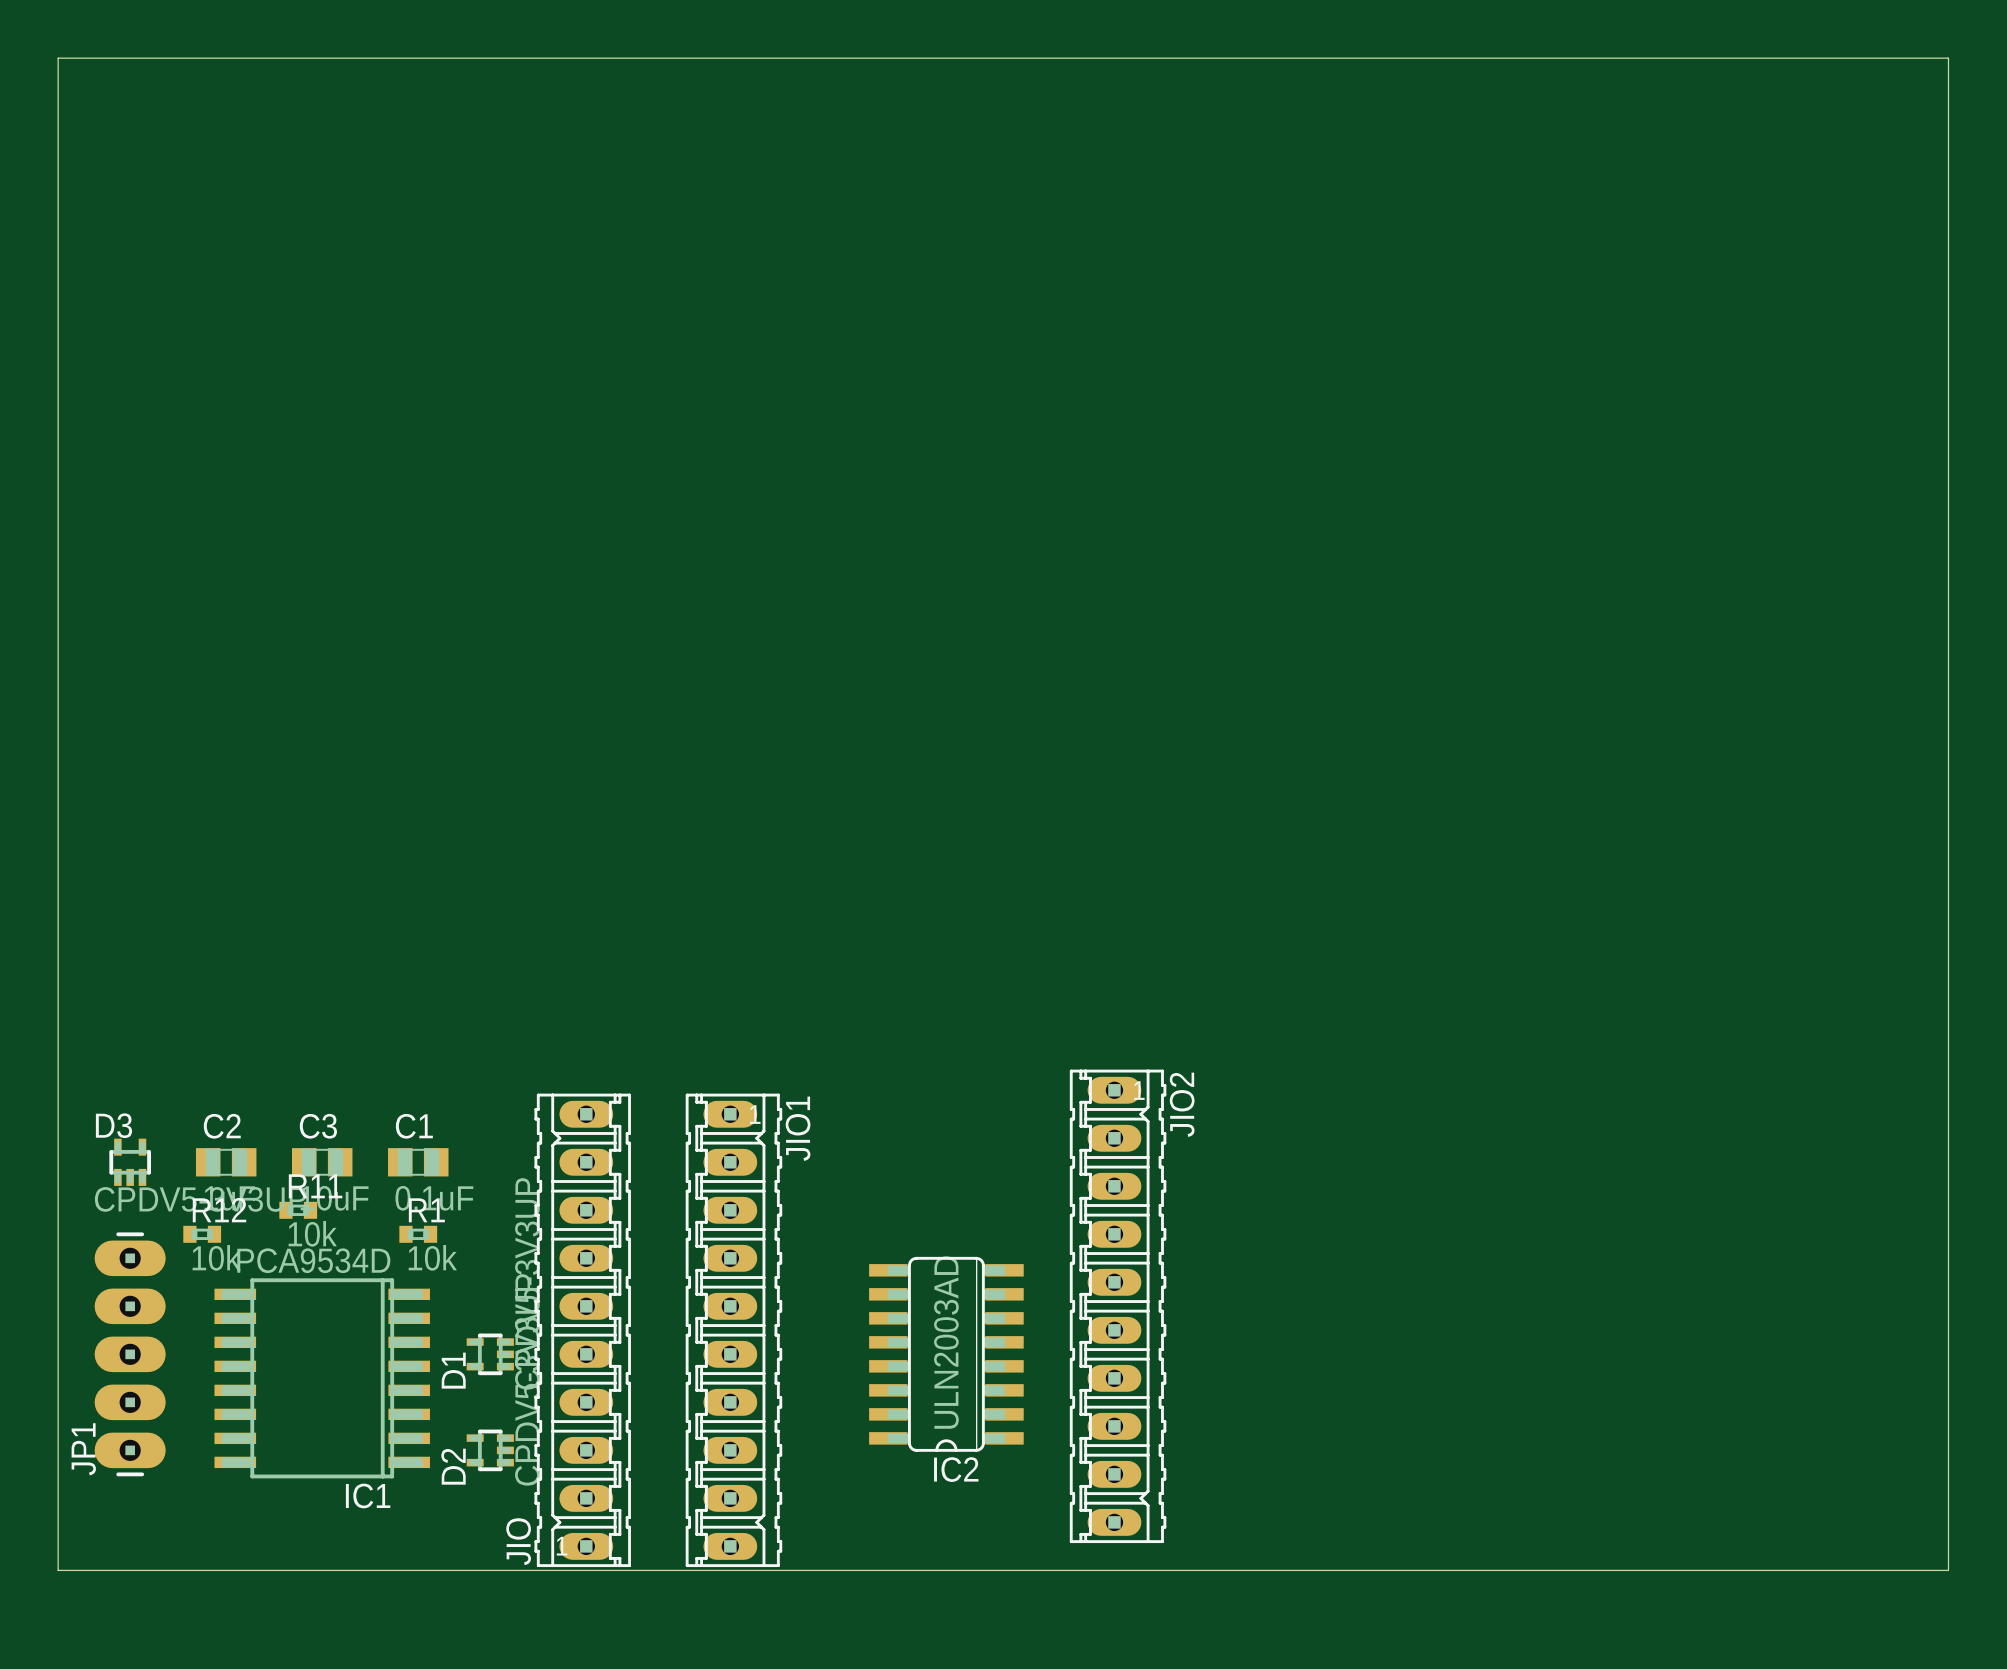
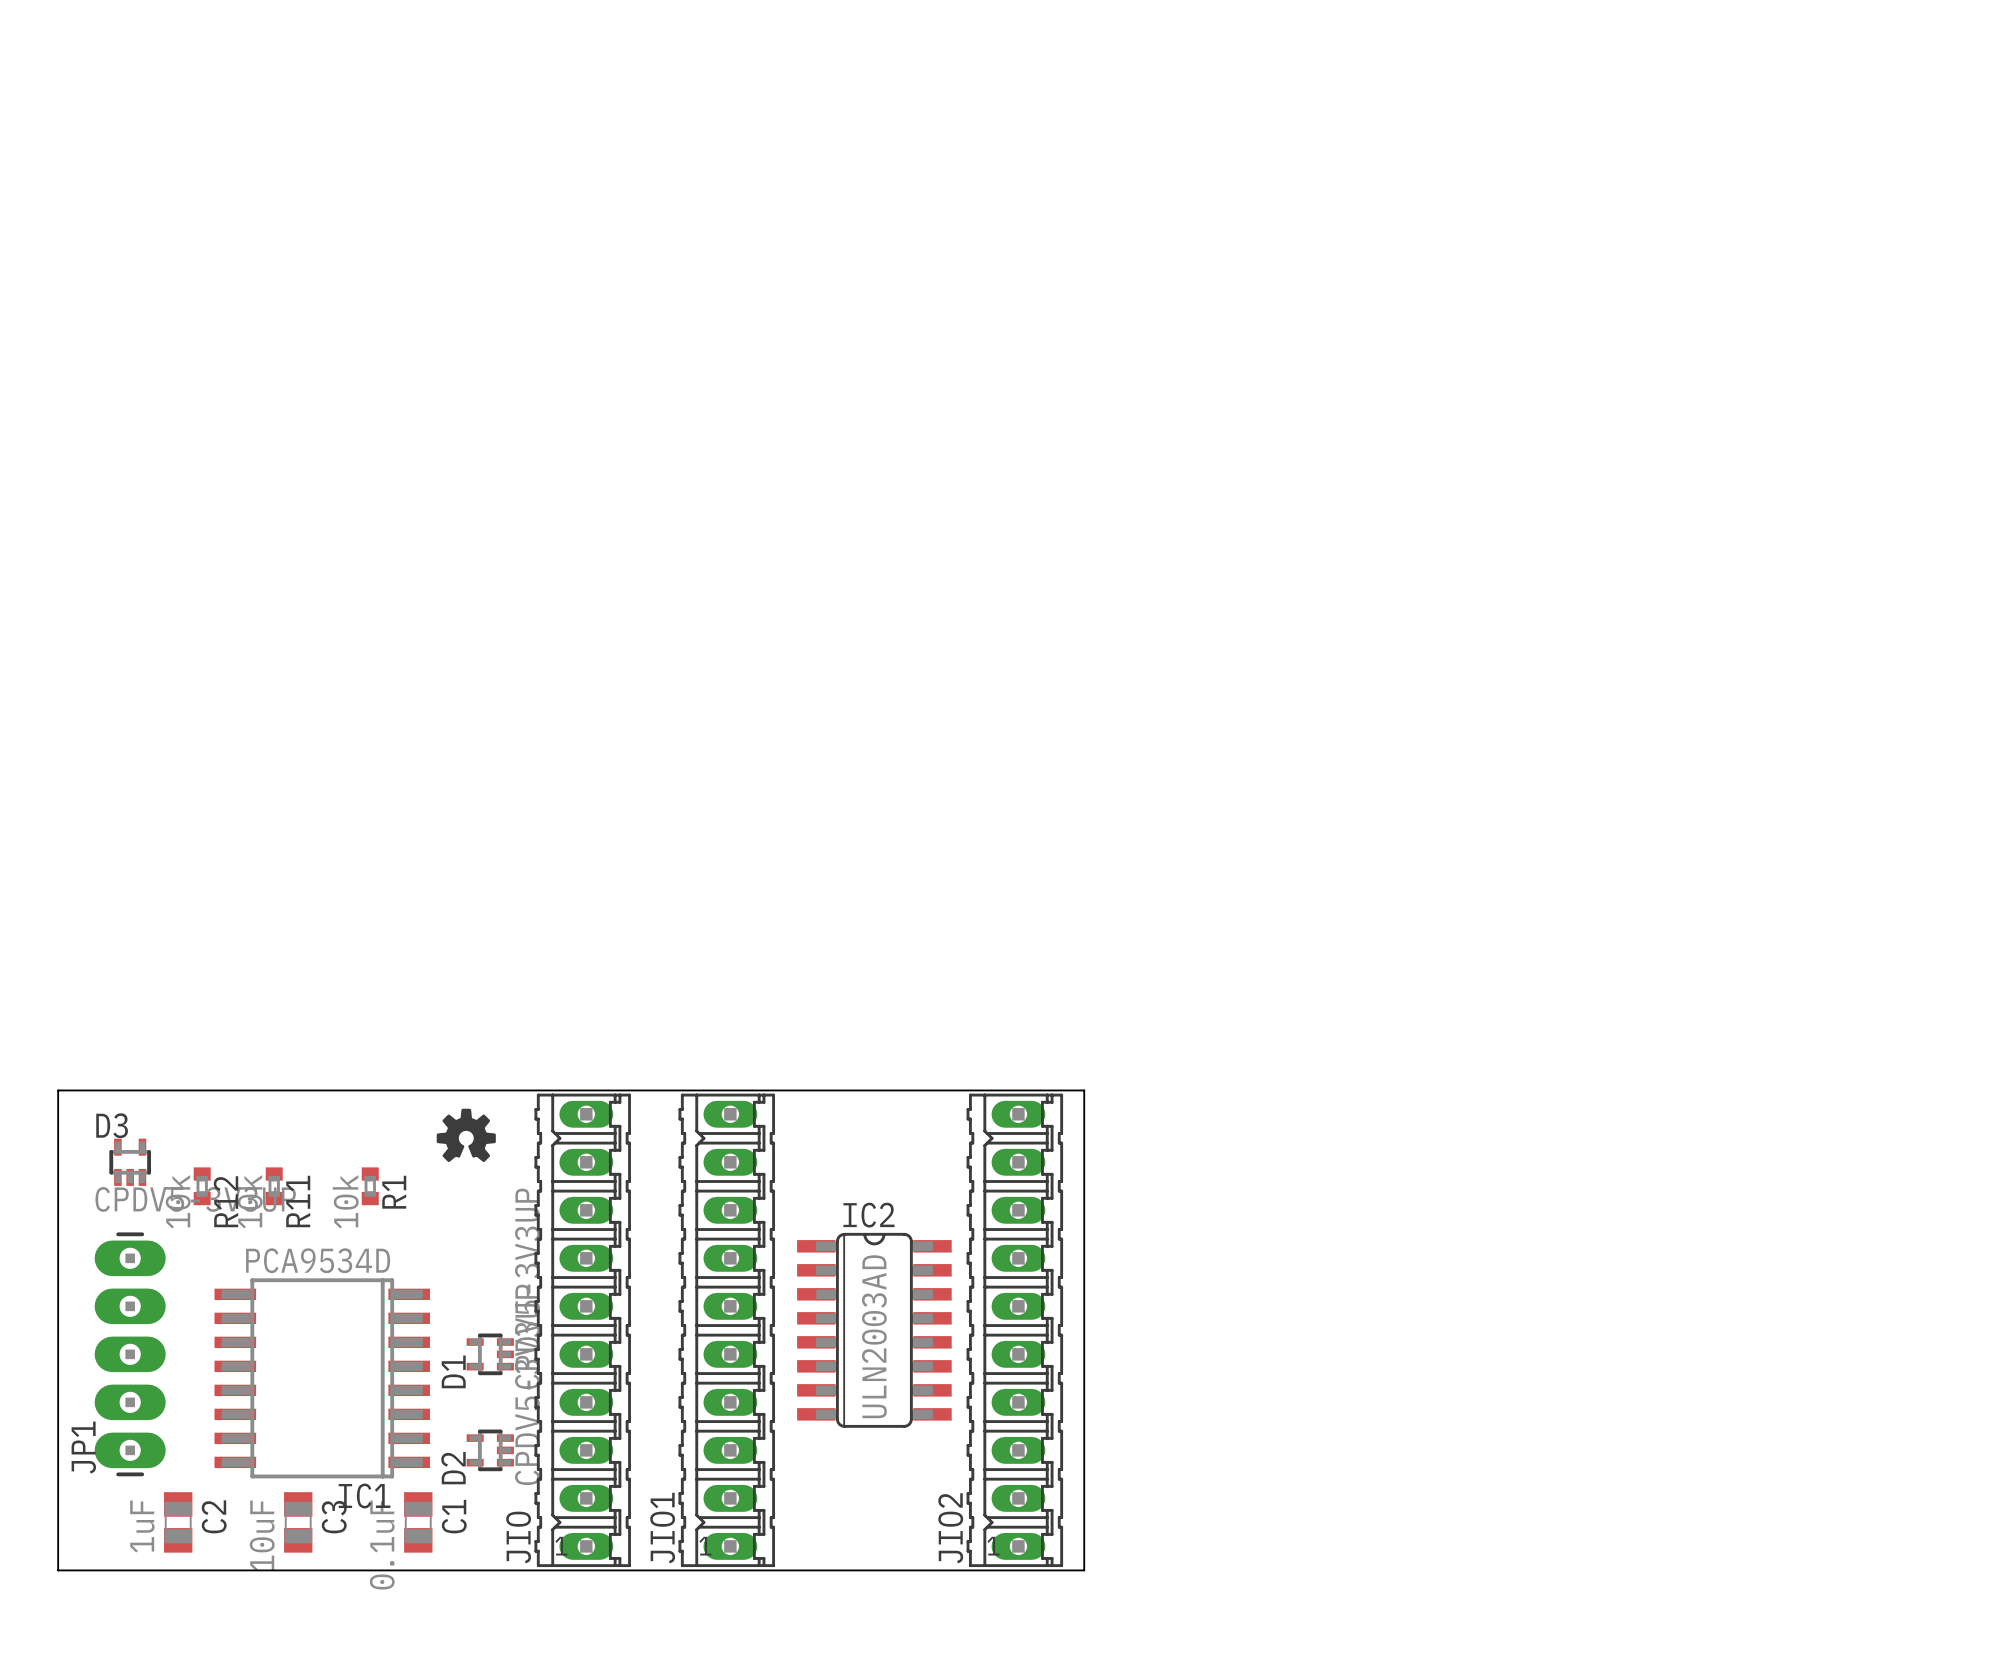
JIO2 footprint: [1069, 1069, 1167, 1544] -> [966, 1093, 1064, 1568]
board edge: (58, 1090) (58, 58) (1948, 58) (1948, 1570) (1084, 1570) -> (58, 1090) (1084, 1090) (1084, 1570)
JIO1 footprint: [685, 1093, 783, 1568] -> [678, 1093, 776, 1568]
JIO2 name position: JIO2 (1182, 1104) -> JIO2 (950, 1528)
drawing: none -> [436, 1108, 496, 1163]
JIO1 name position: JIO1 (798, 1128) -> JIO1 (662, 1528)
C2 rotation: 0° (226, 1162) -> 90° clockwise (178, 1522)
C2 position: (226, 1162) -> (178, 1522)
C3 rotation: 0° (322, 1162) -> 90° clockwise (298, 1522)
C3 position: (322, 1162) -> (298, 1522)
C1 rotation: 0° (418, 1162) -> 90° clockwise (418, 1522)
C1 position: (418, 1162) -> (418, 1522)
R11 rotation: 0° (298, 1210) -> 90° clockwise (274, 1186)
R11 position: (298, 1210) -> (274, 1186)
R12 rotation: 0° (202, 1234) -> 90° clockwise (202, 1186)
R12 position: (202, 1234) -> (202, 1186)
R1 rotation: 0° (418, 1234) -> 90° clockwise (370, 1186)
R1 position: (418, 1234) -> (370, 1186)
IC2 rotation: 0° (946, 1354) -> 180° (874, 1330)

